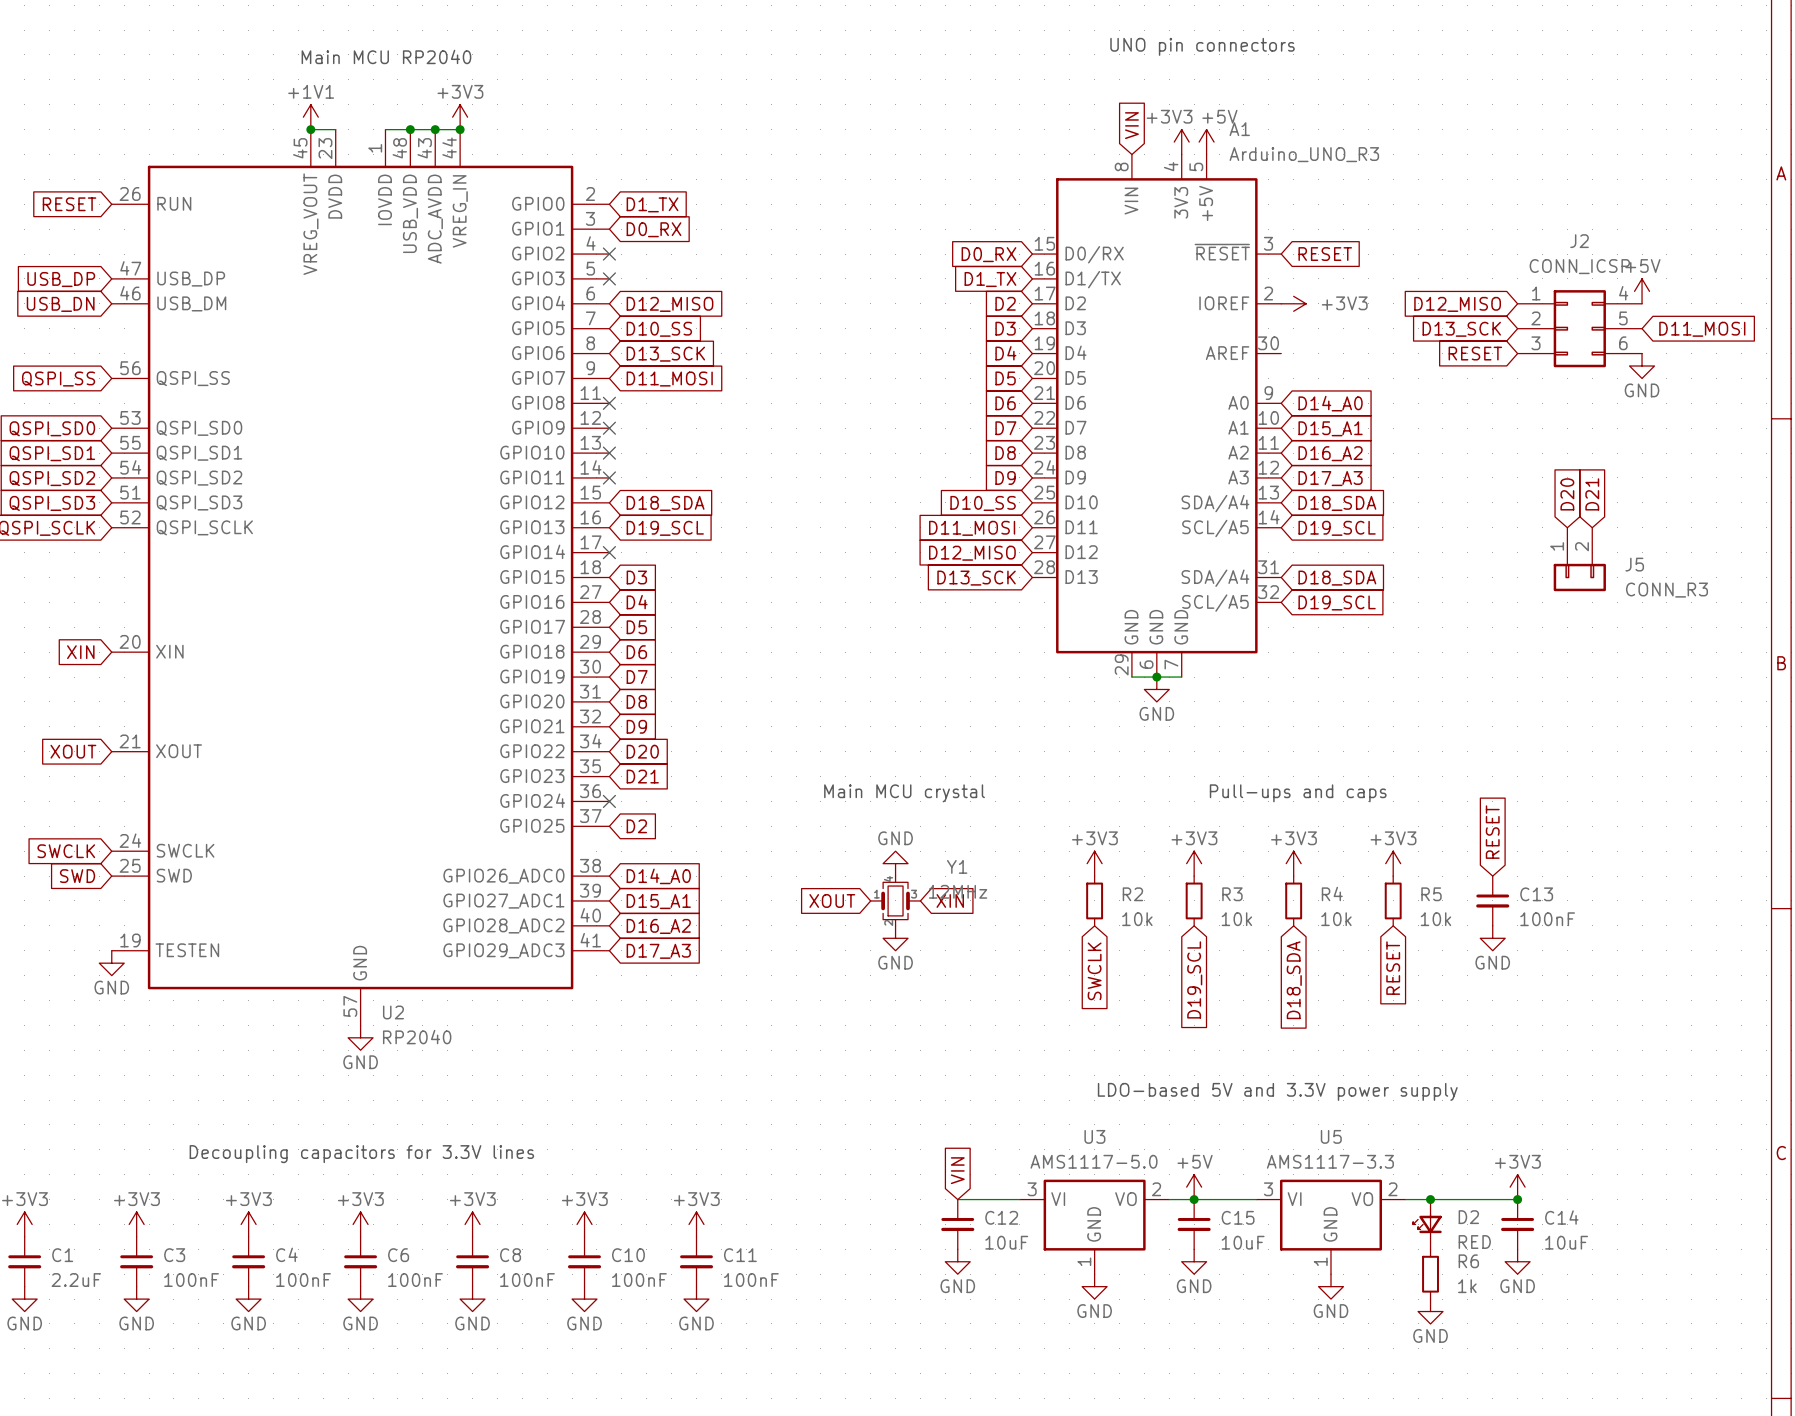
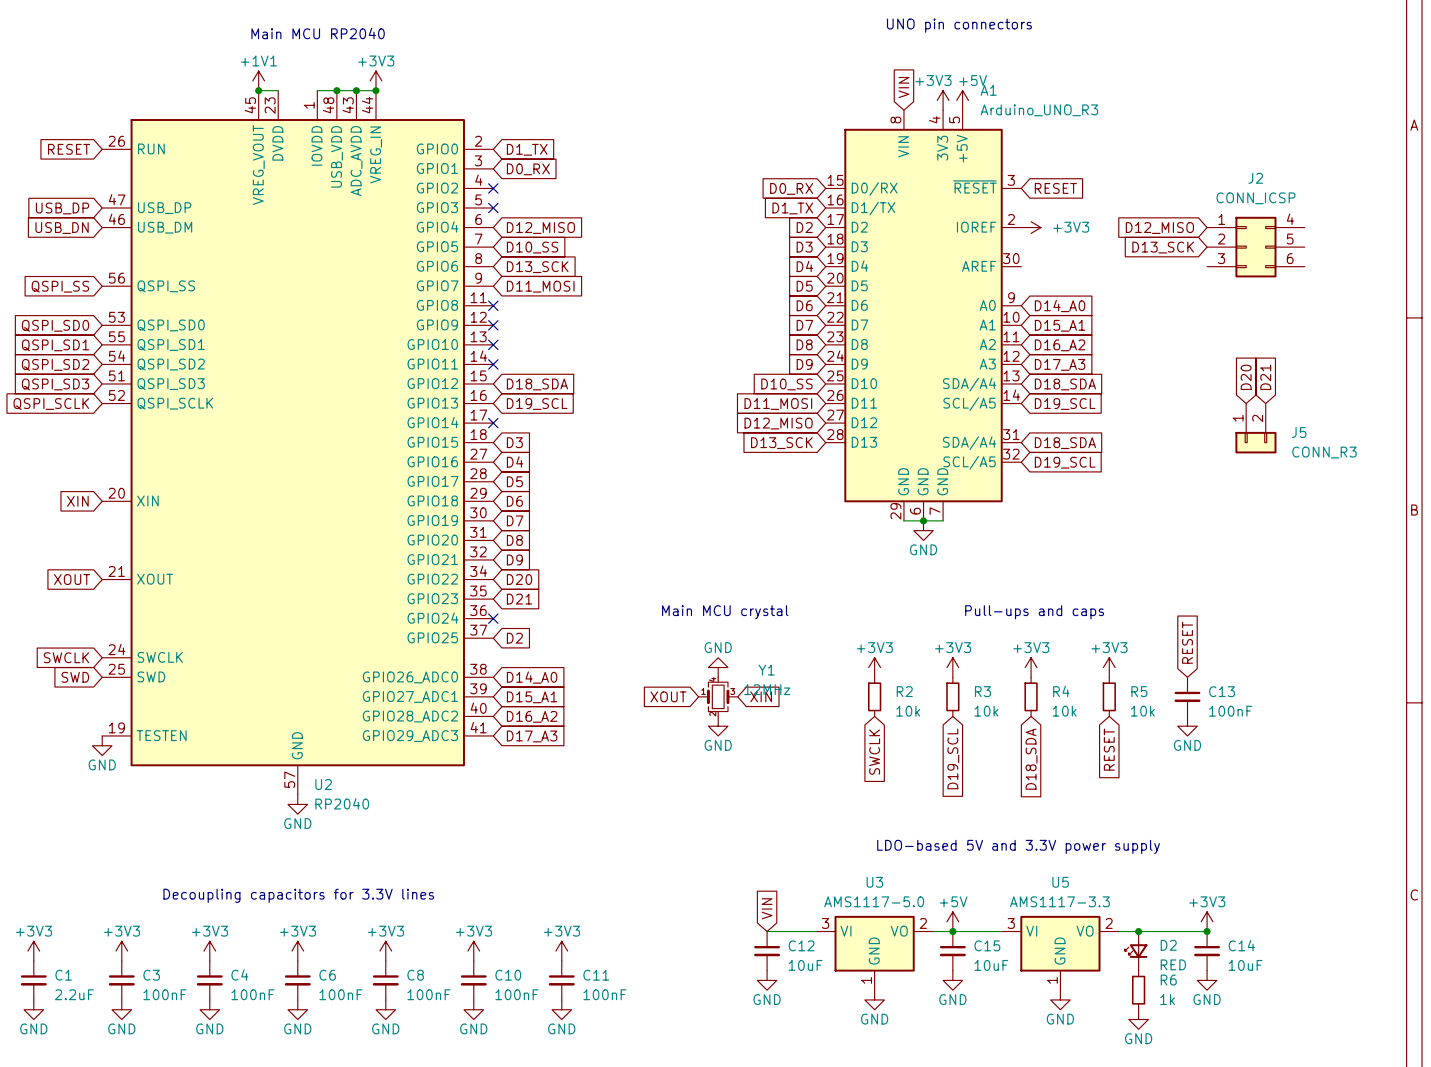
power symbol: +5V (1642, 291) -> none
global label: D11_MOSI (1702, 329) -> none
global label: RESET (1475, 353) -> none
power symbol: GND (1642, 366) -> none

